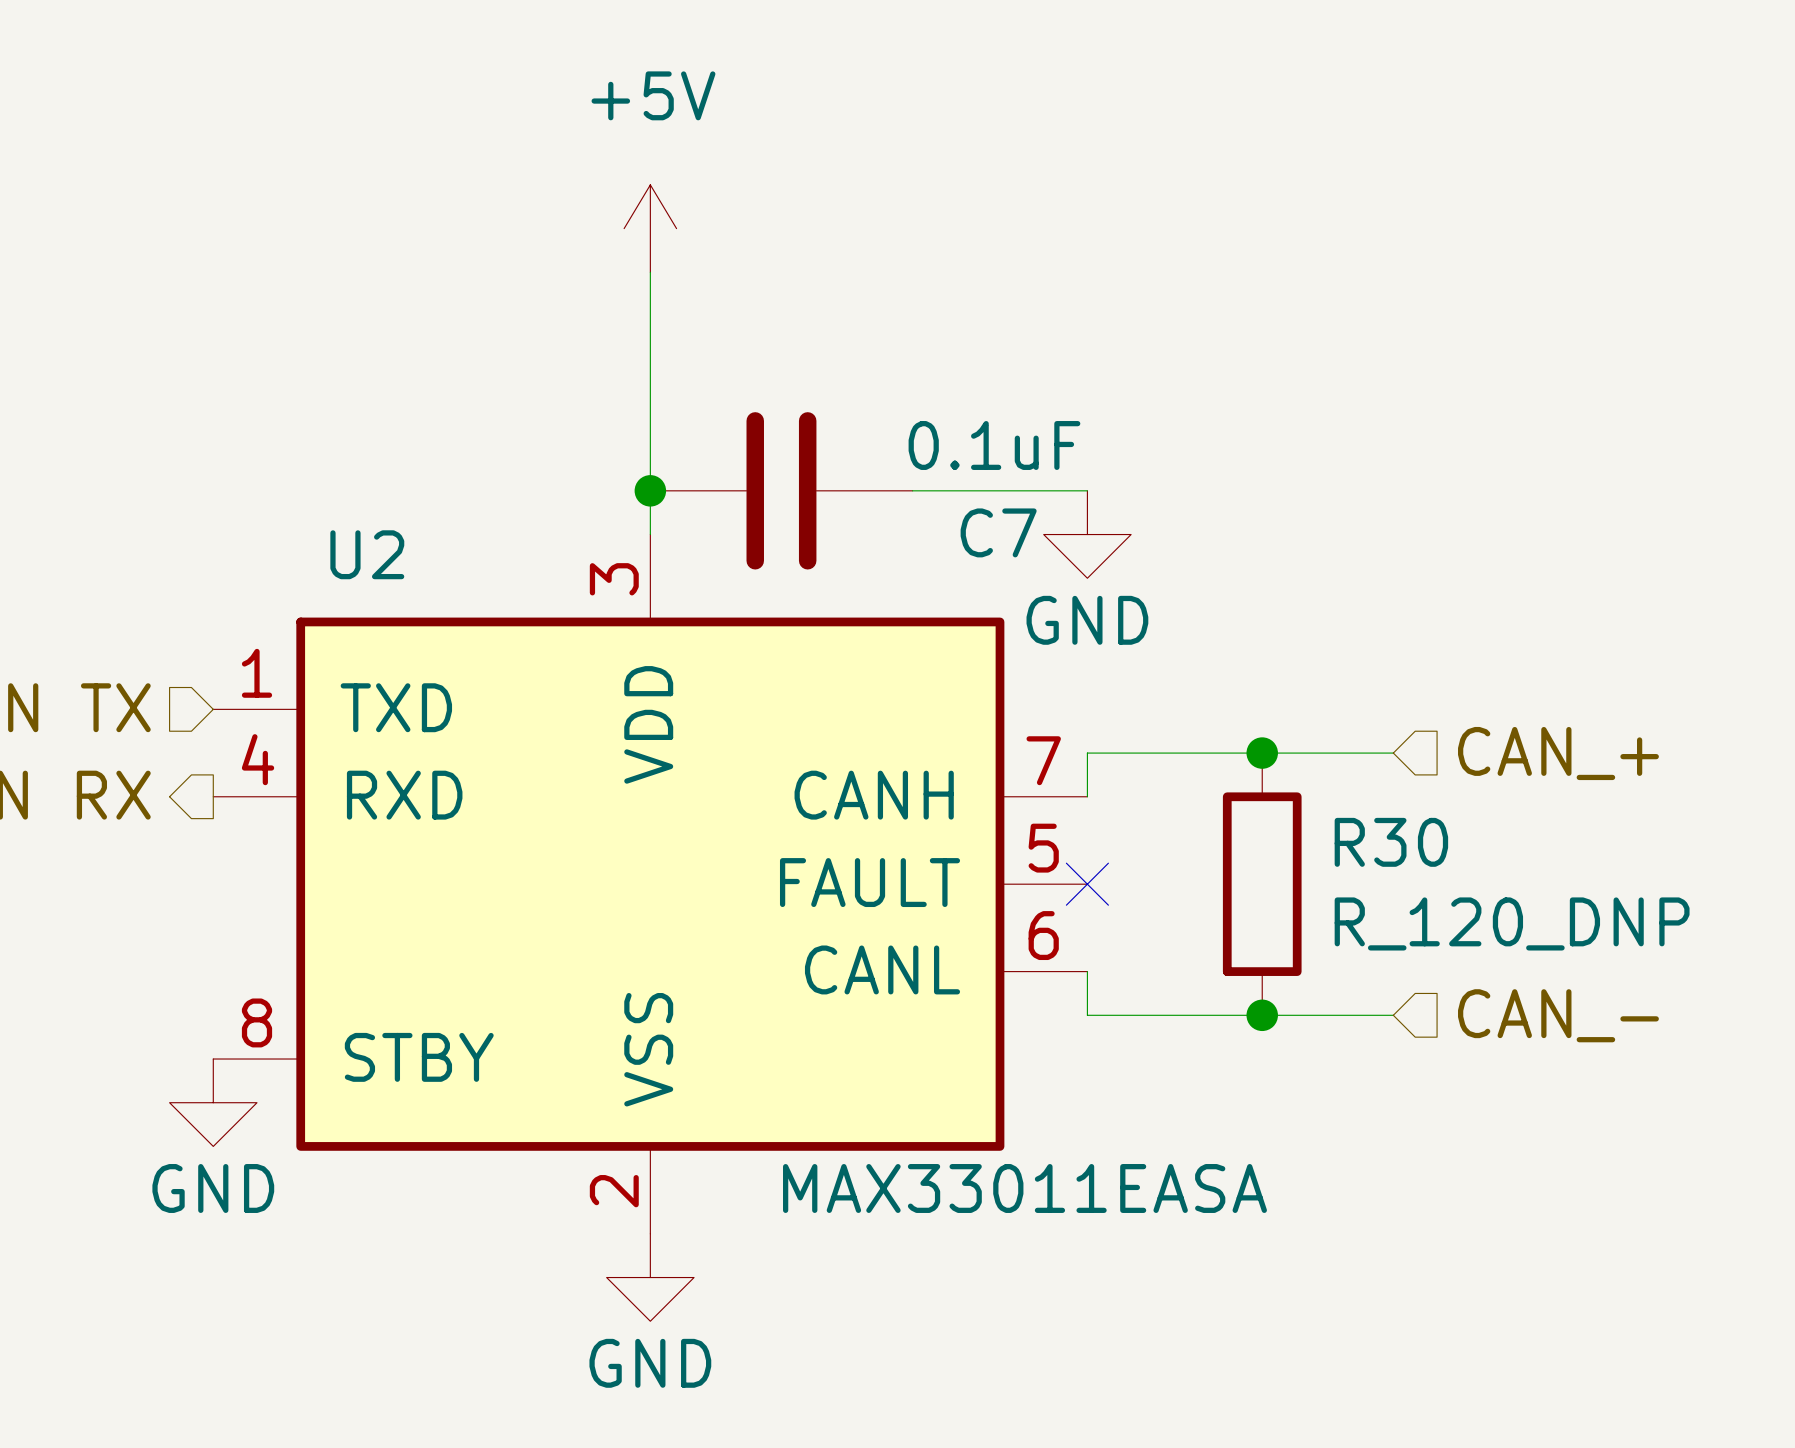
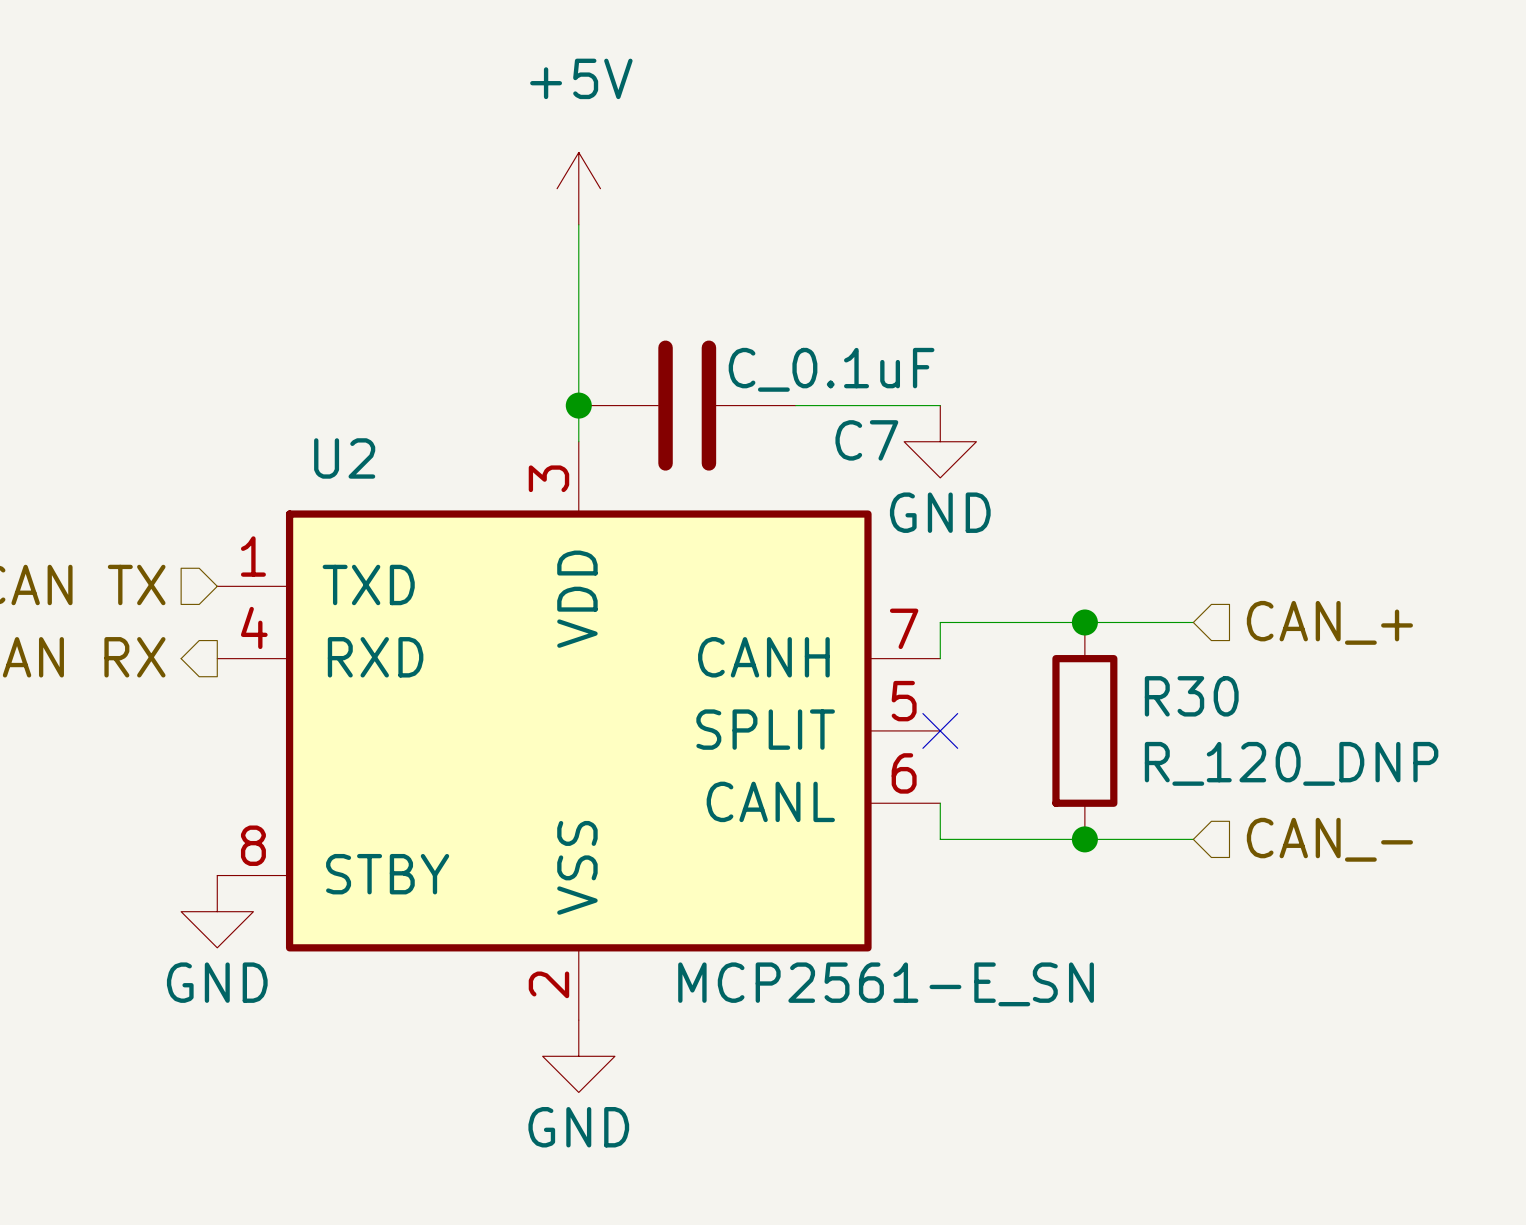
C7 value: 0.1uF (994, 445) -> C_0.1uF (831, 369)
U2 pin name: FAULT (870, 882) -> SPLIT (765, 729)
U2 value: MAX33011EASA (1024, 1188) -> MCP2561-E_SN (886, 984)

